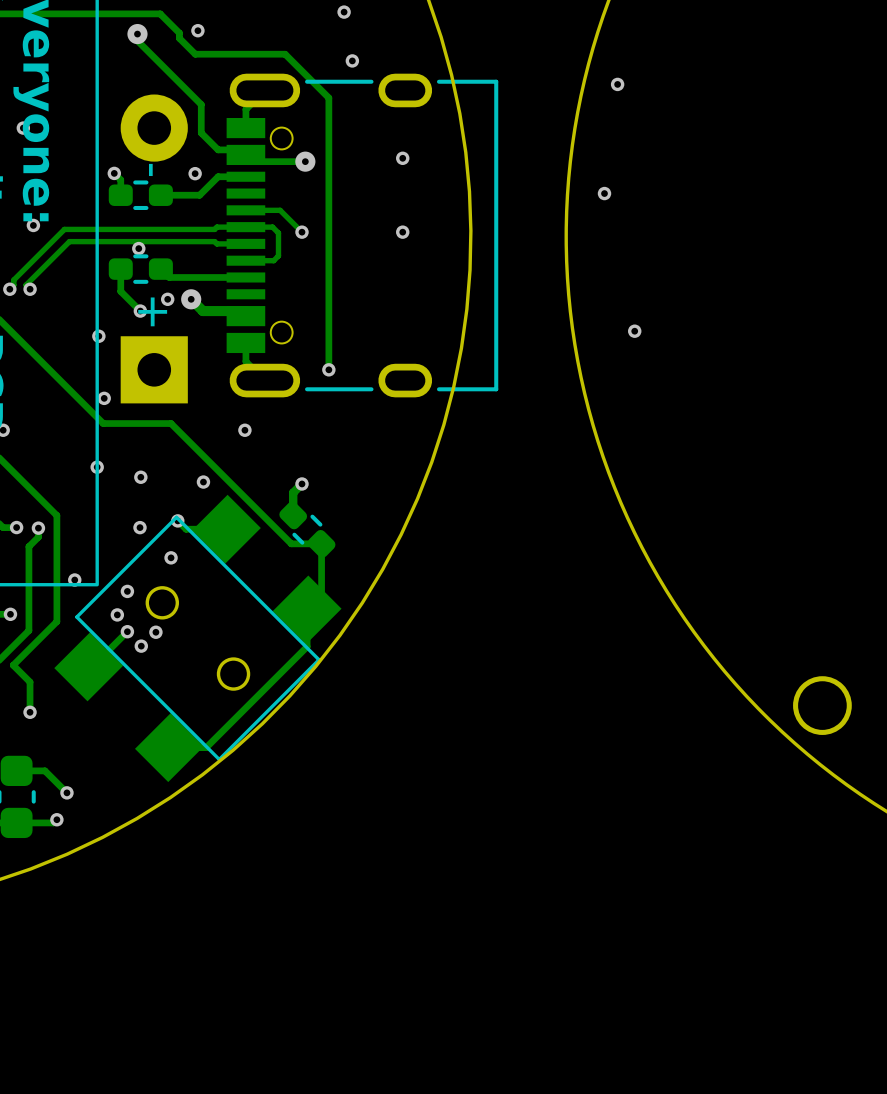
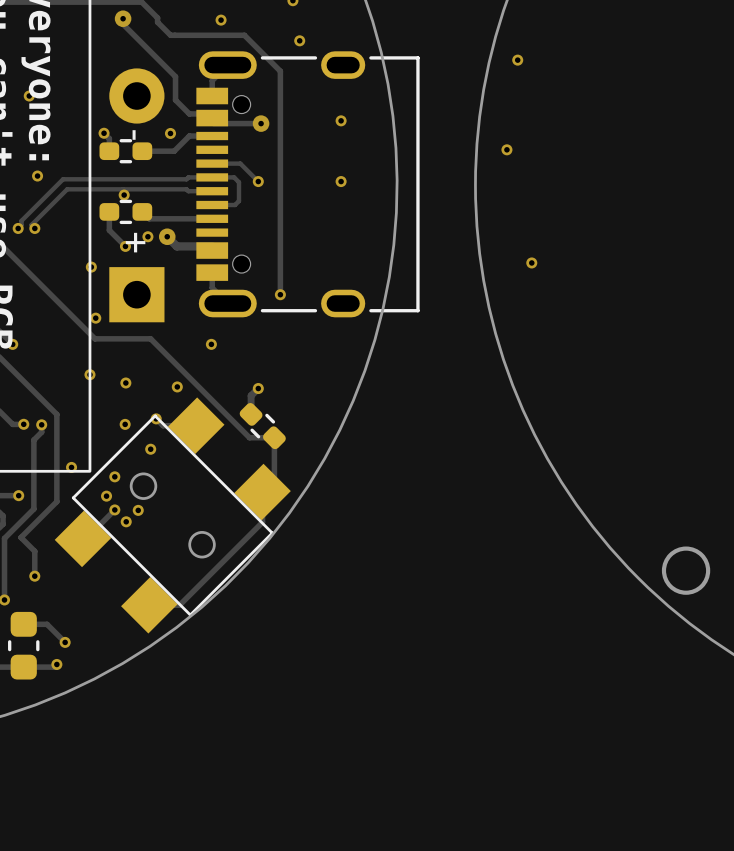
via position: (197, 30) -> (221, 20)

